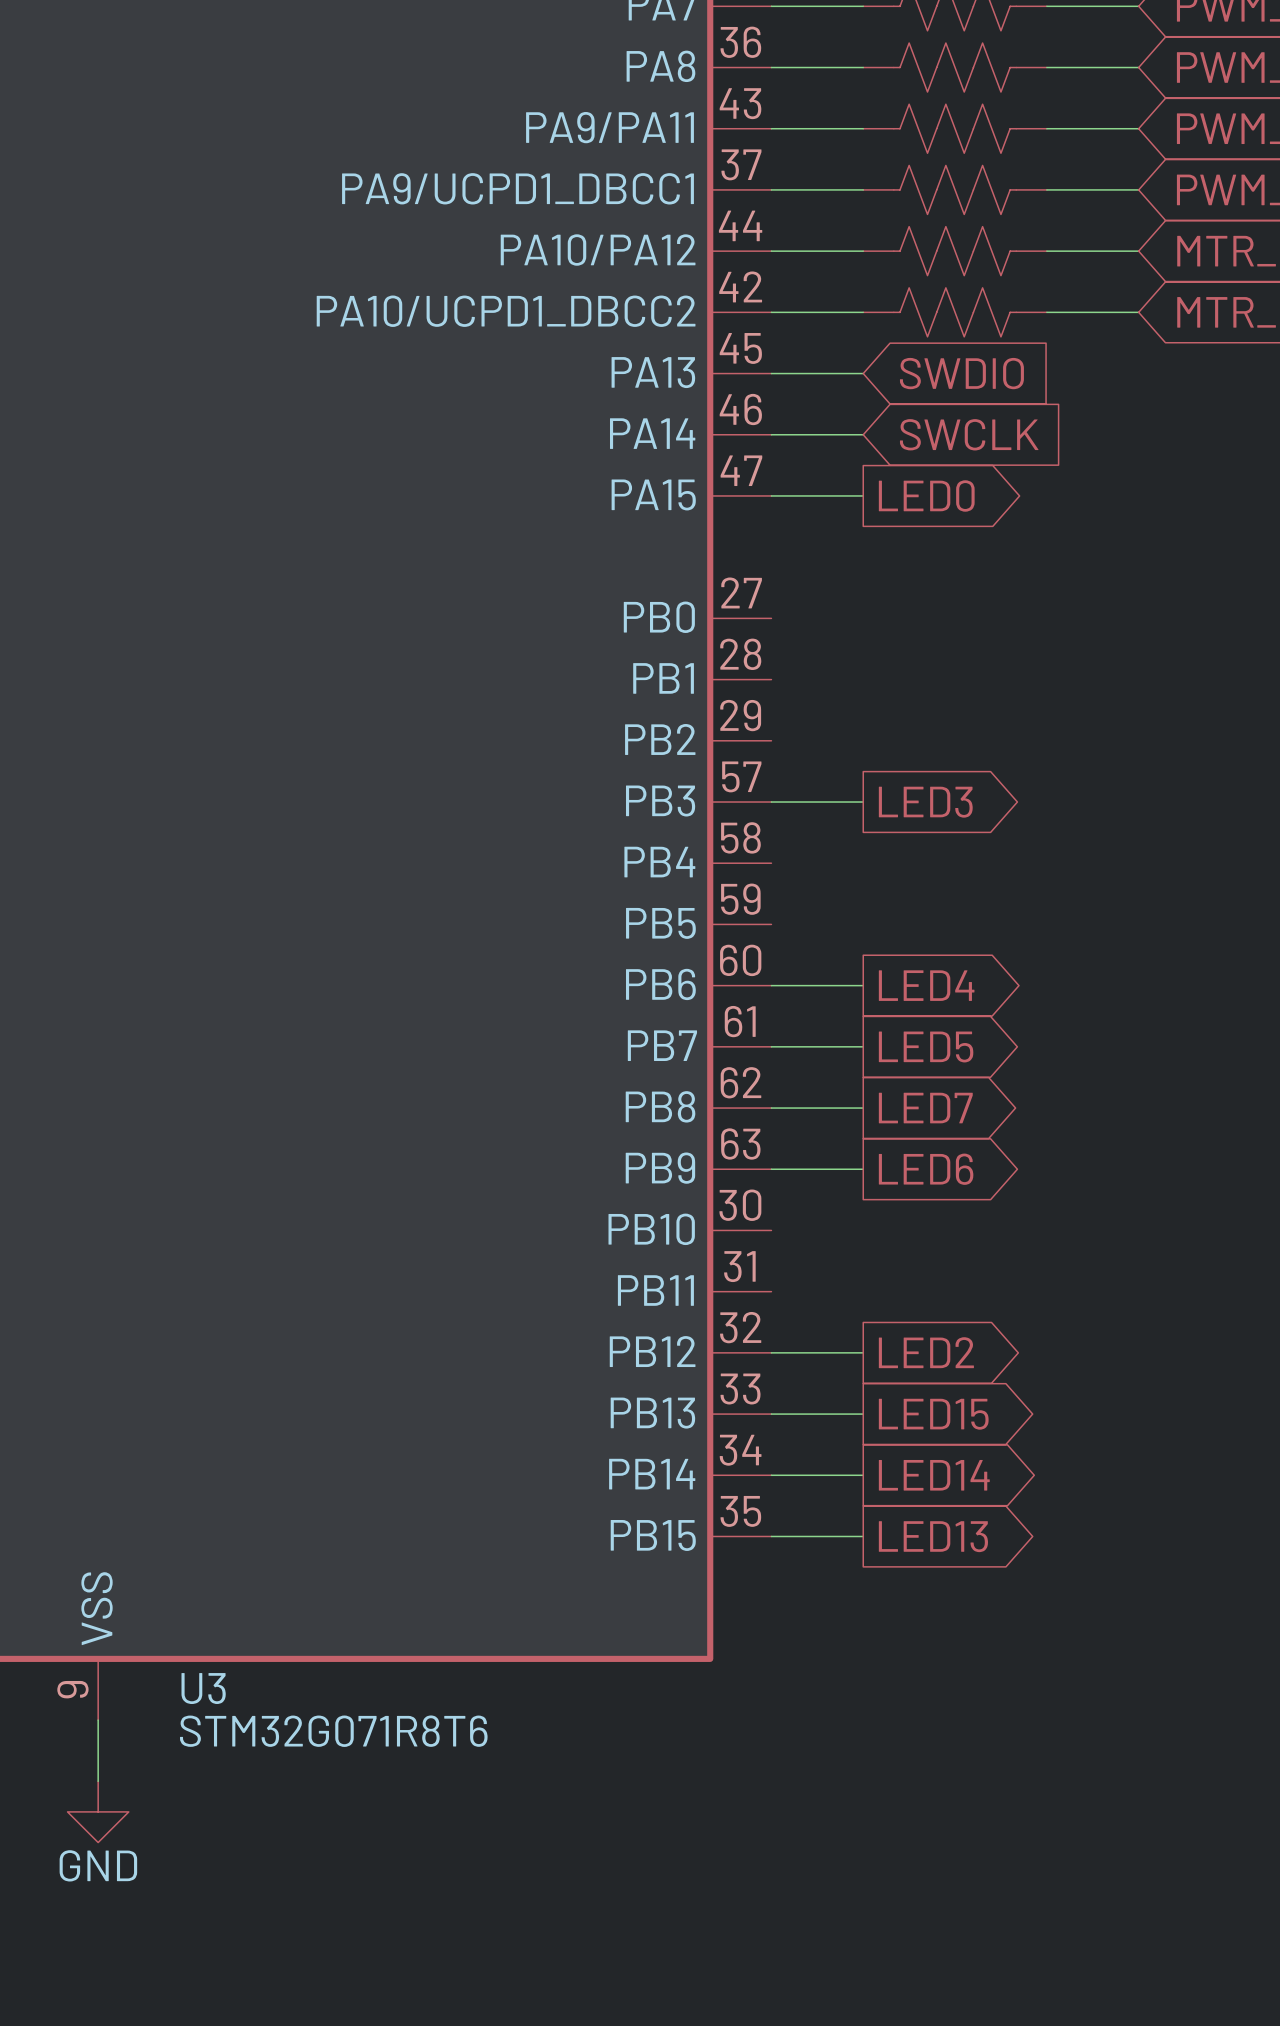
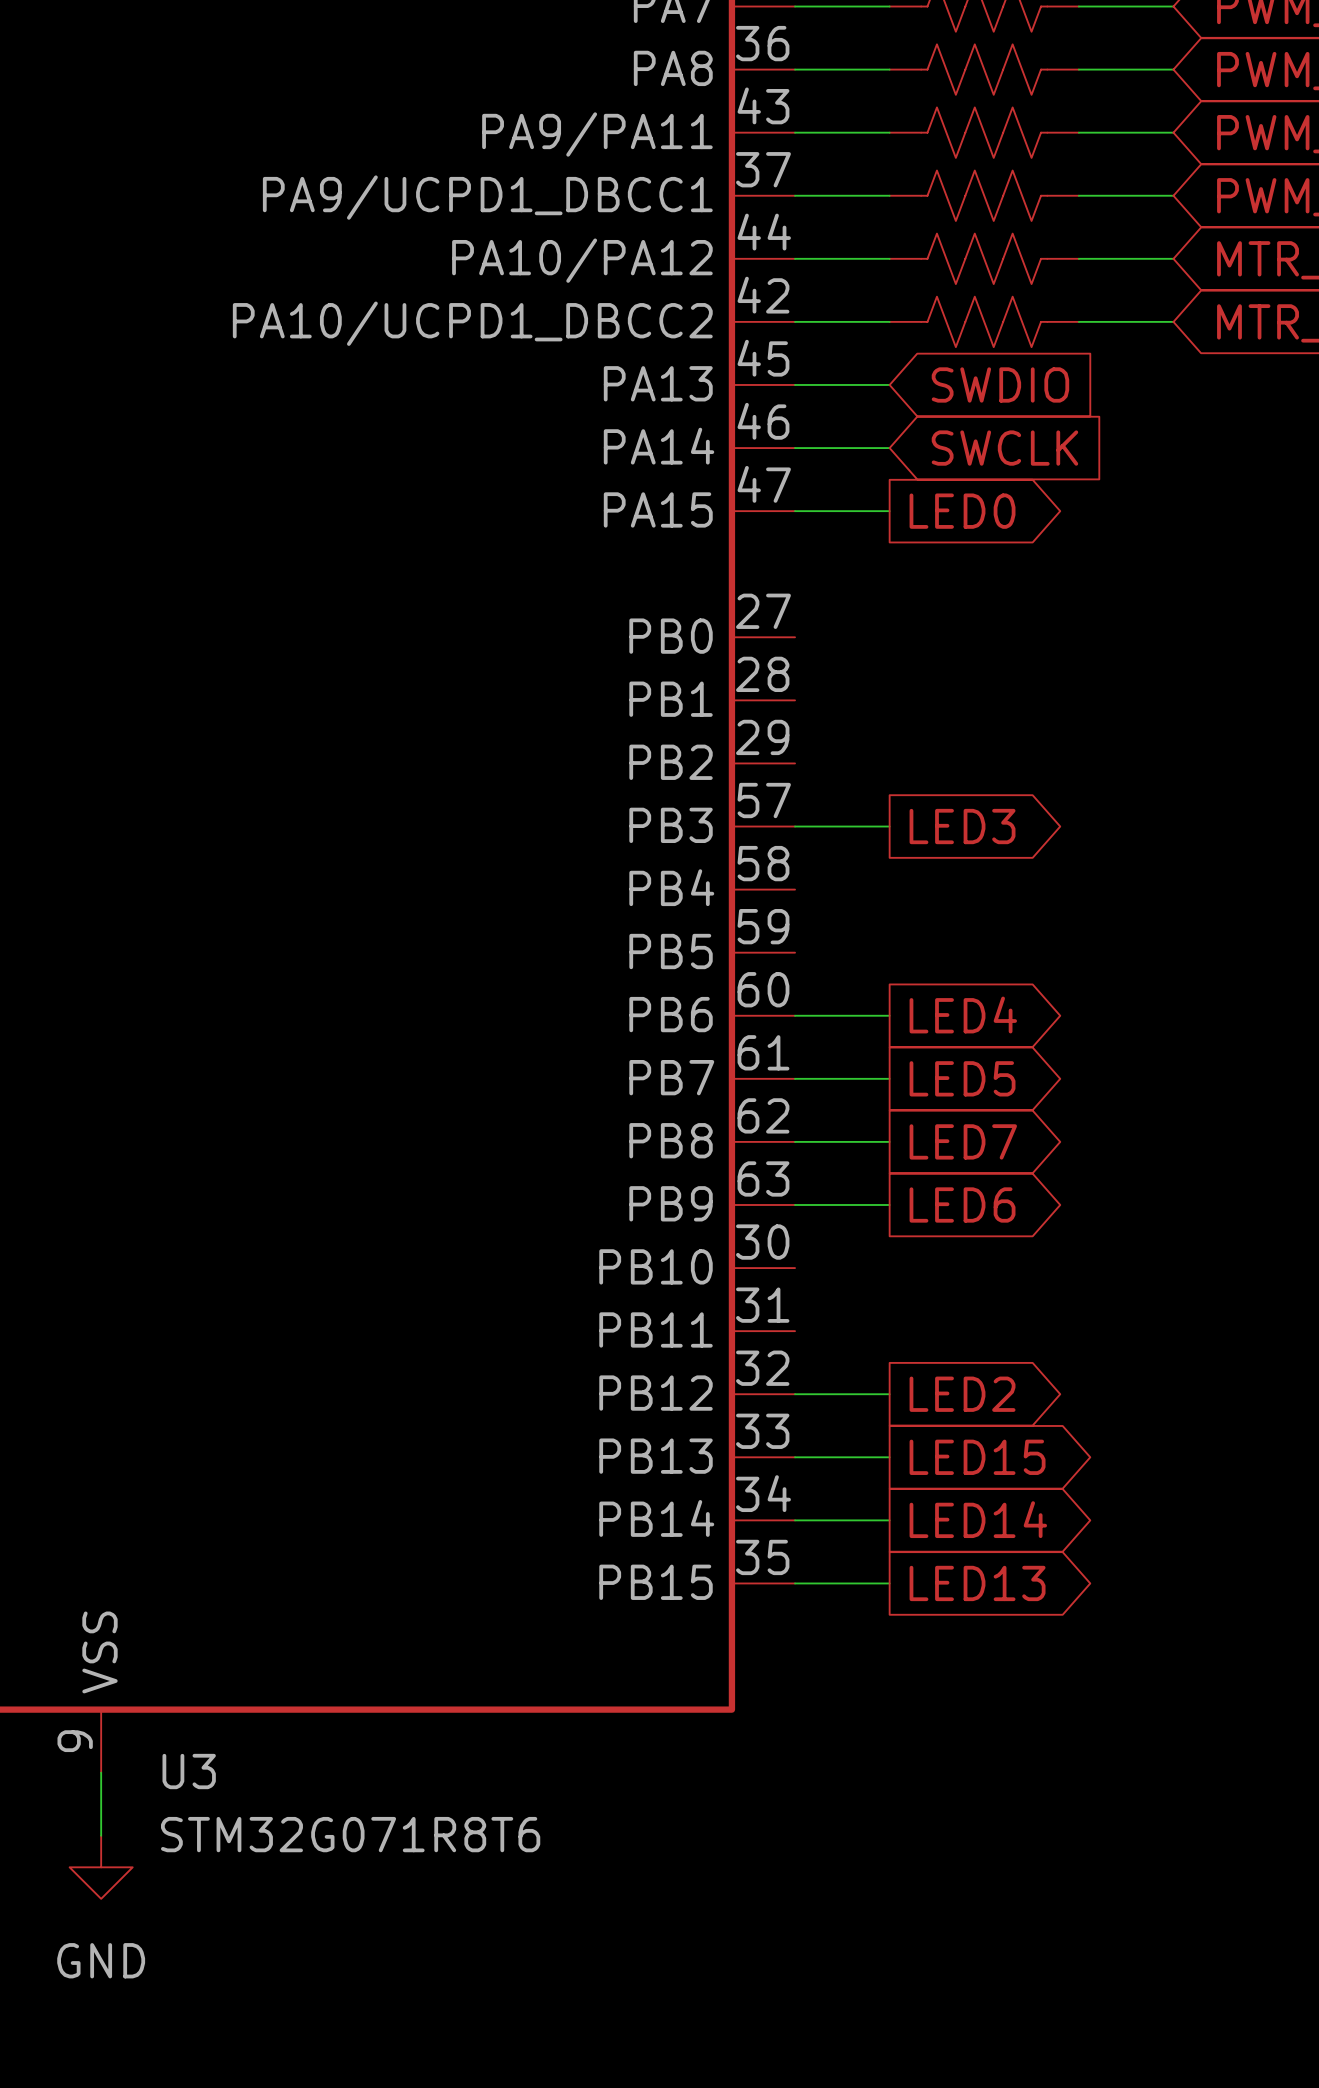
U3 name position: U3 (203, 1688) -> U3 (189, 1771)
U3 value position: STM32G071R8T6 (333, 1731) -> STM32G071R8T6 (350, 1834)
power symbol text position: GND (98, 1865) -> GND (101, 1960)

